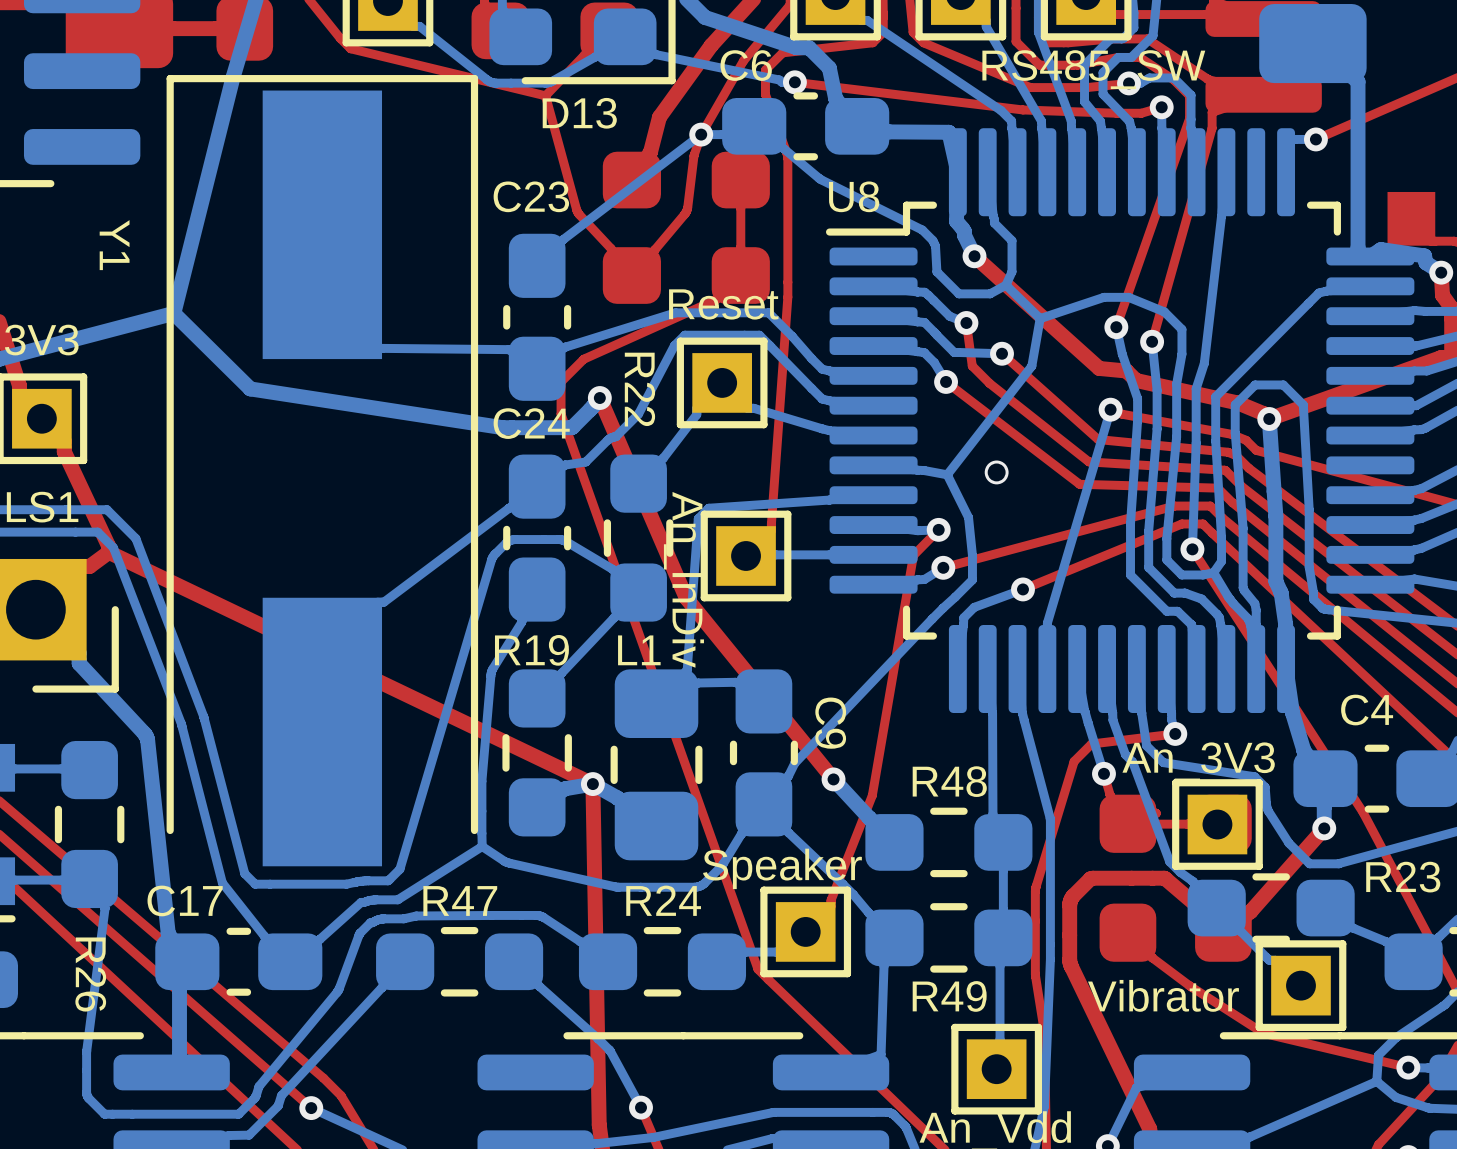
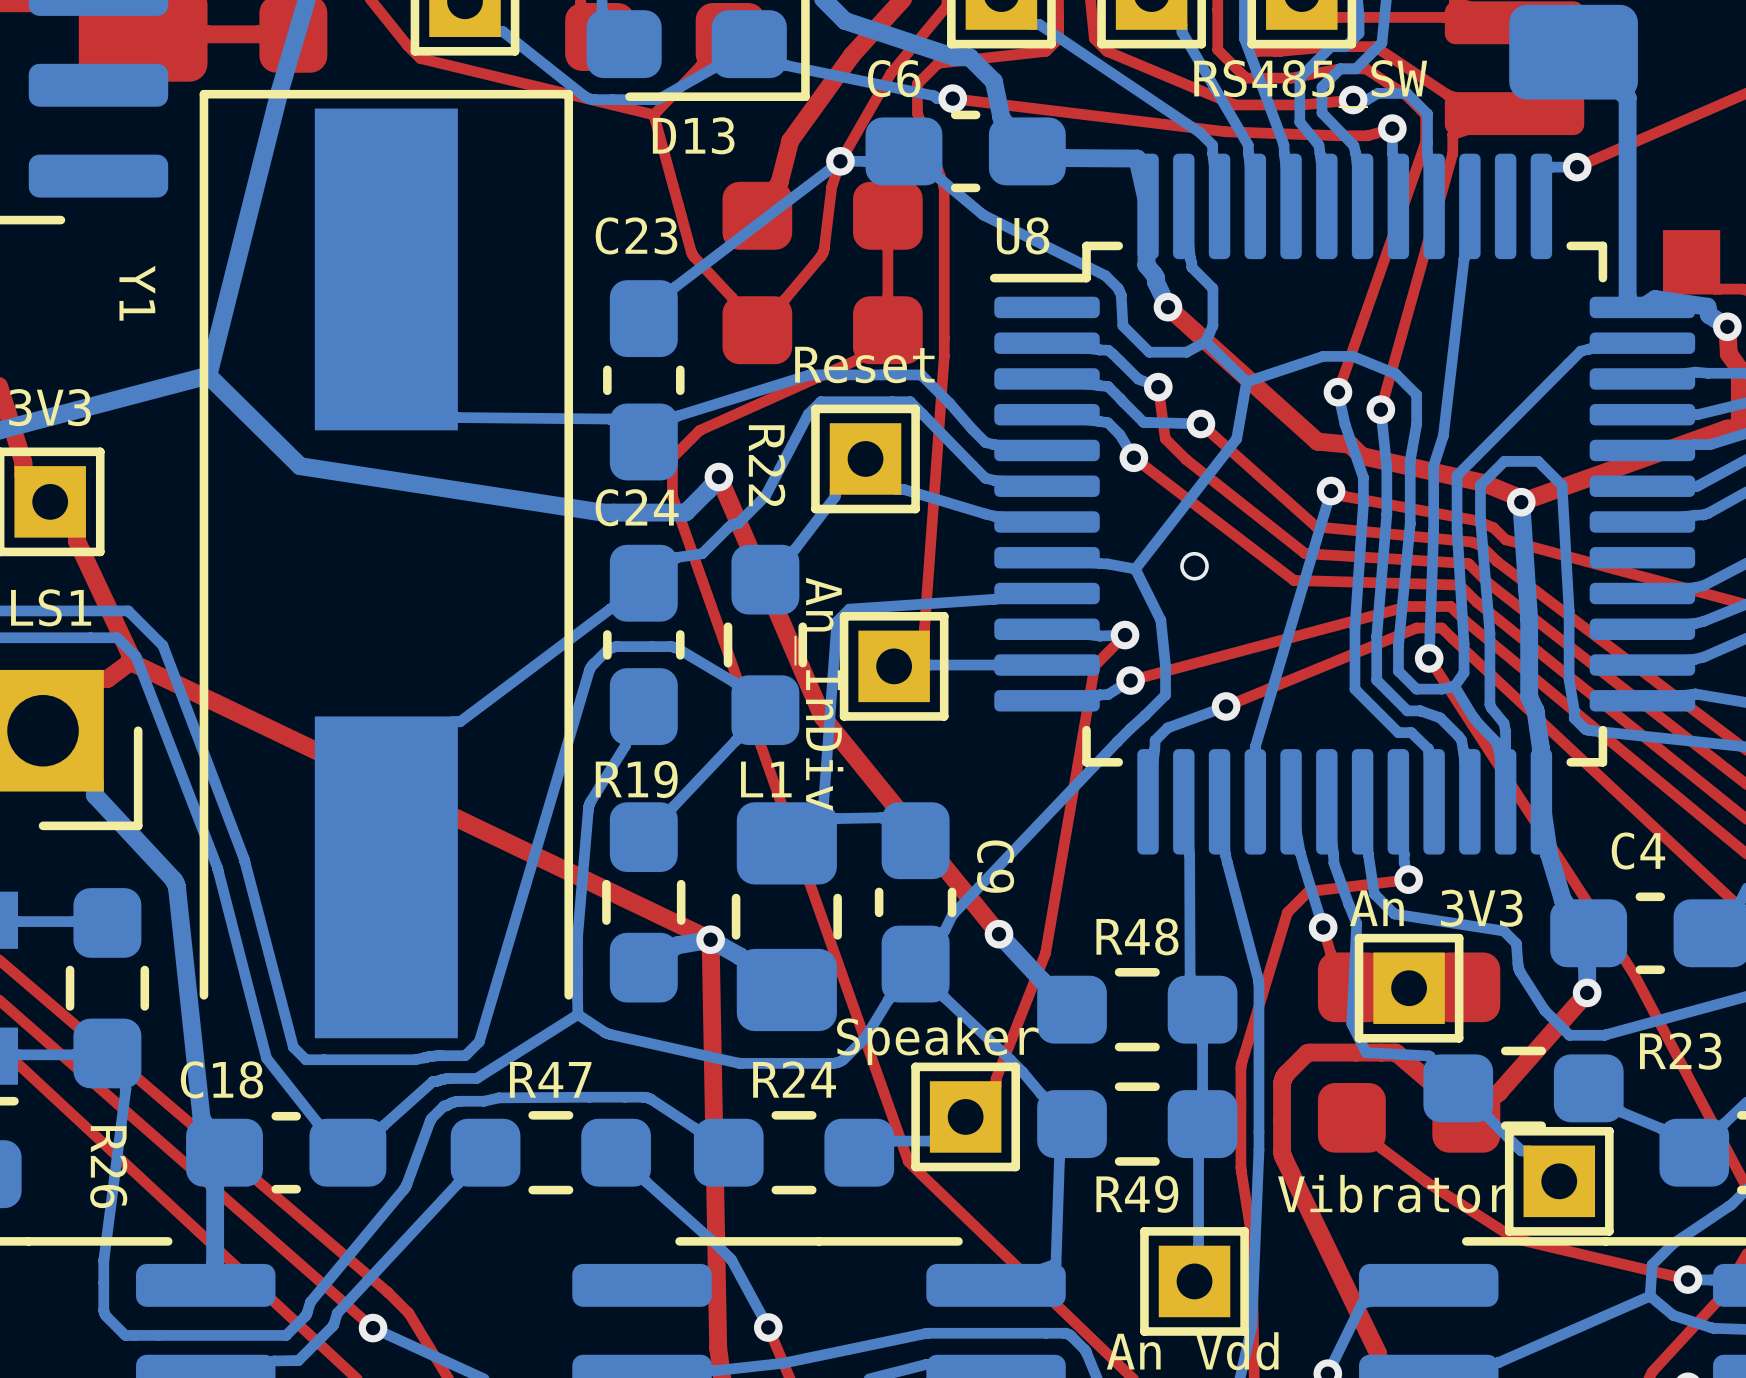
bottom track: (1125, 754) (1132, 761) (1169, 861) (1192, 881) -> (1348, 904) (1356, 923) (1351, 1023) (1366, 1052) (1429, 1055)
part position: (1217, 824) -> (1409, 988)
C17 name: C17 (185, 900) -> C18 (221, 1079)

